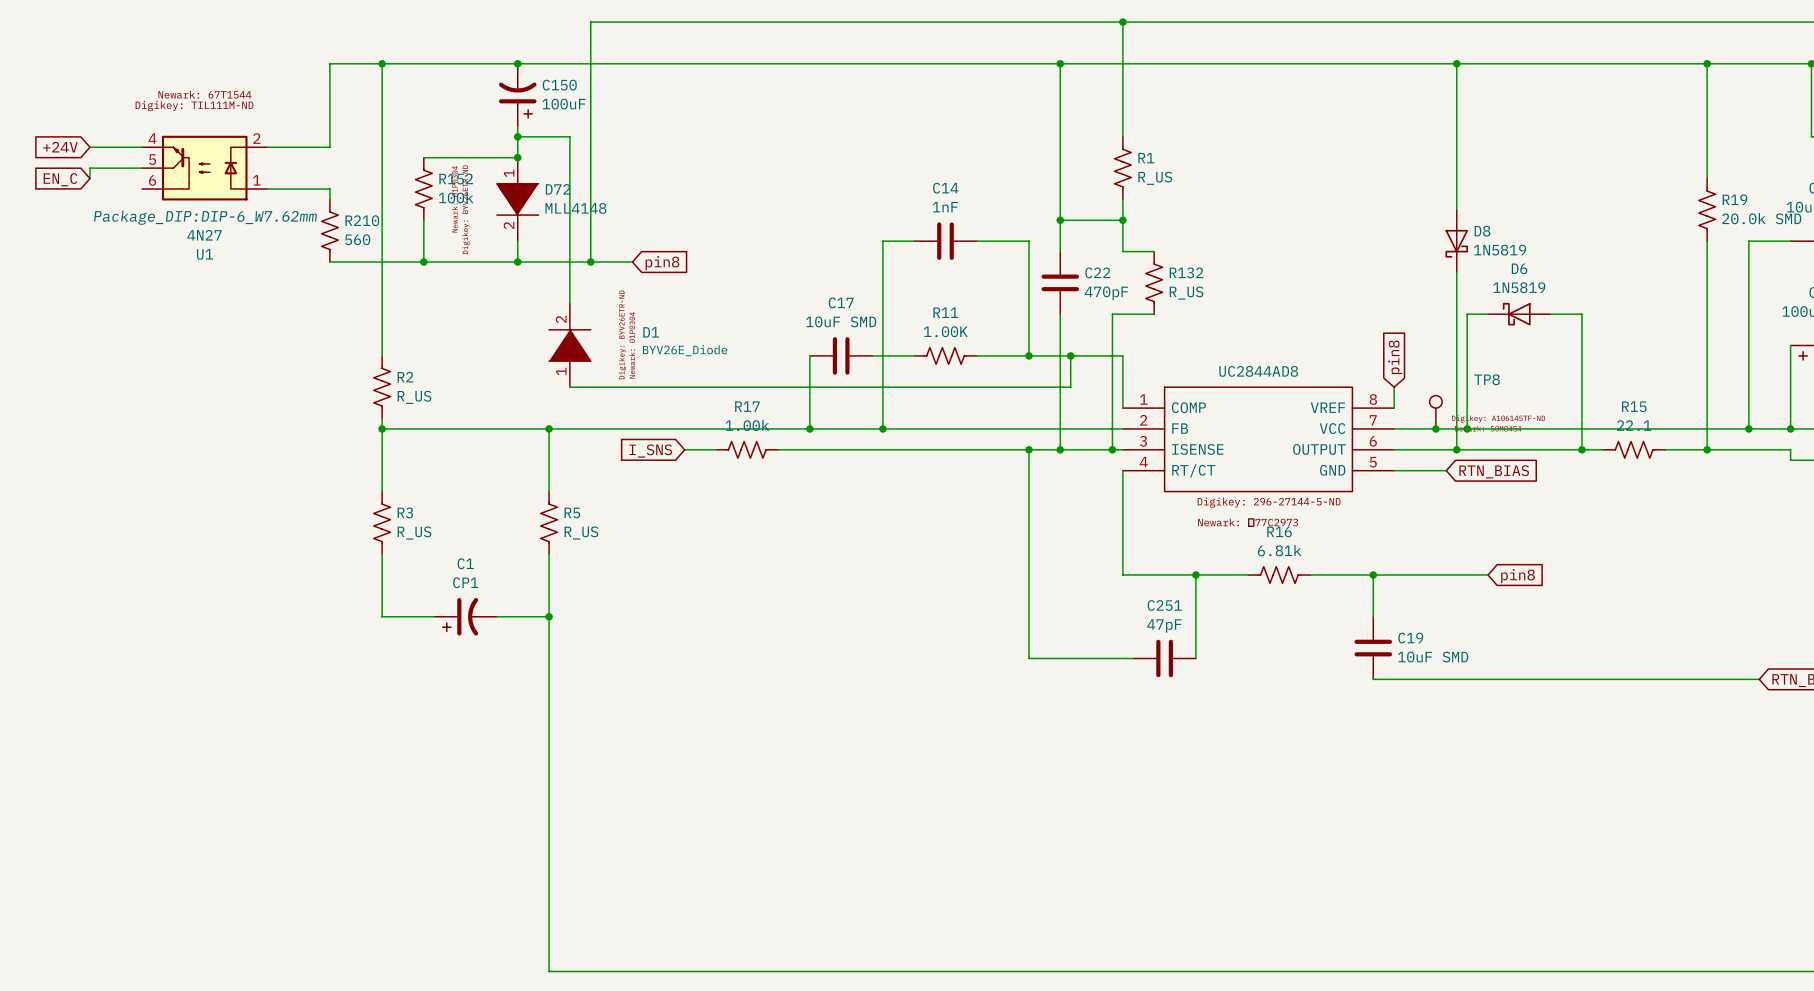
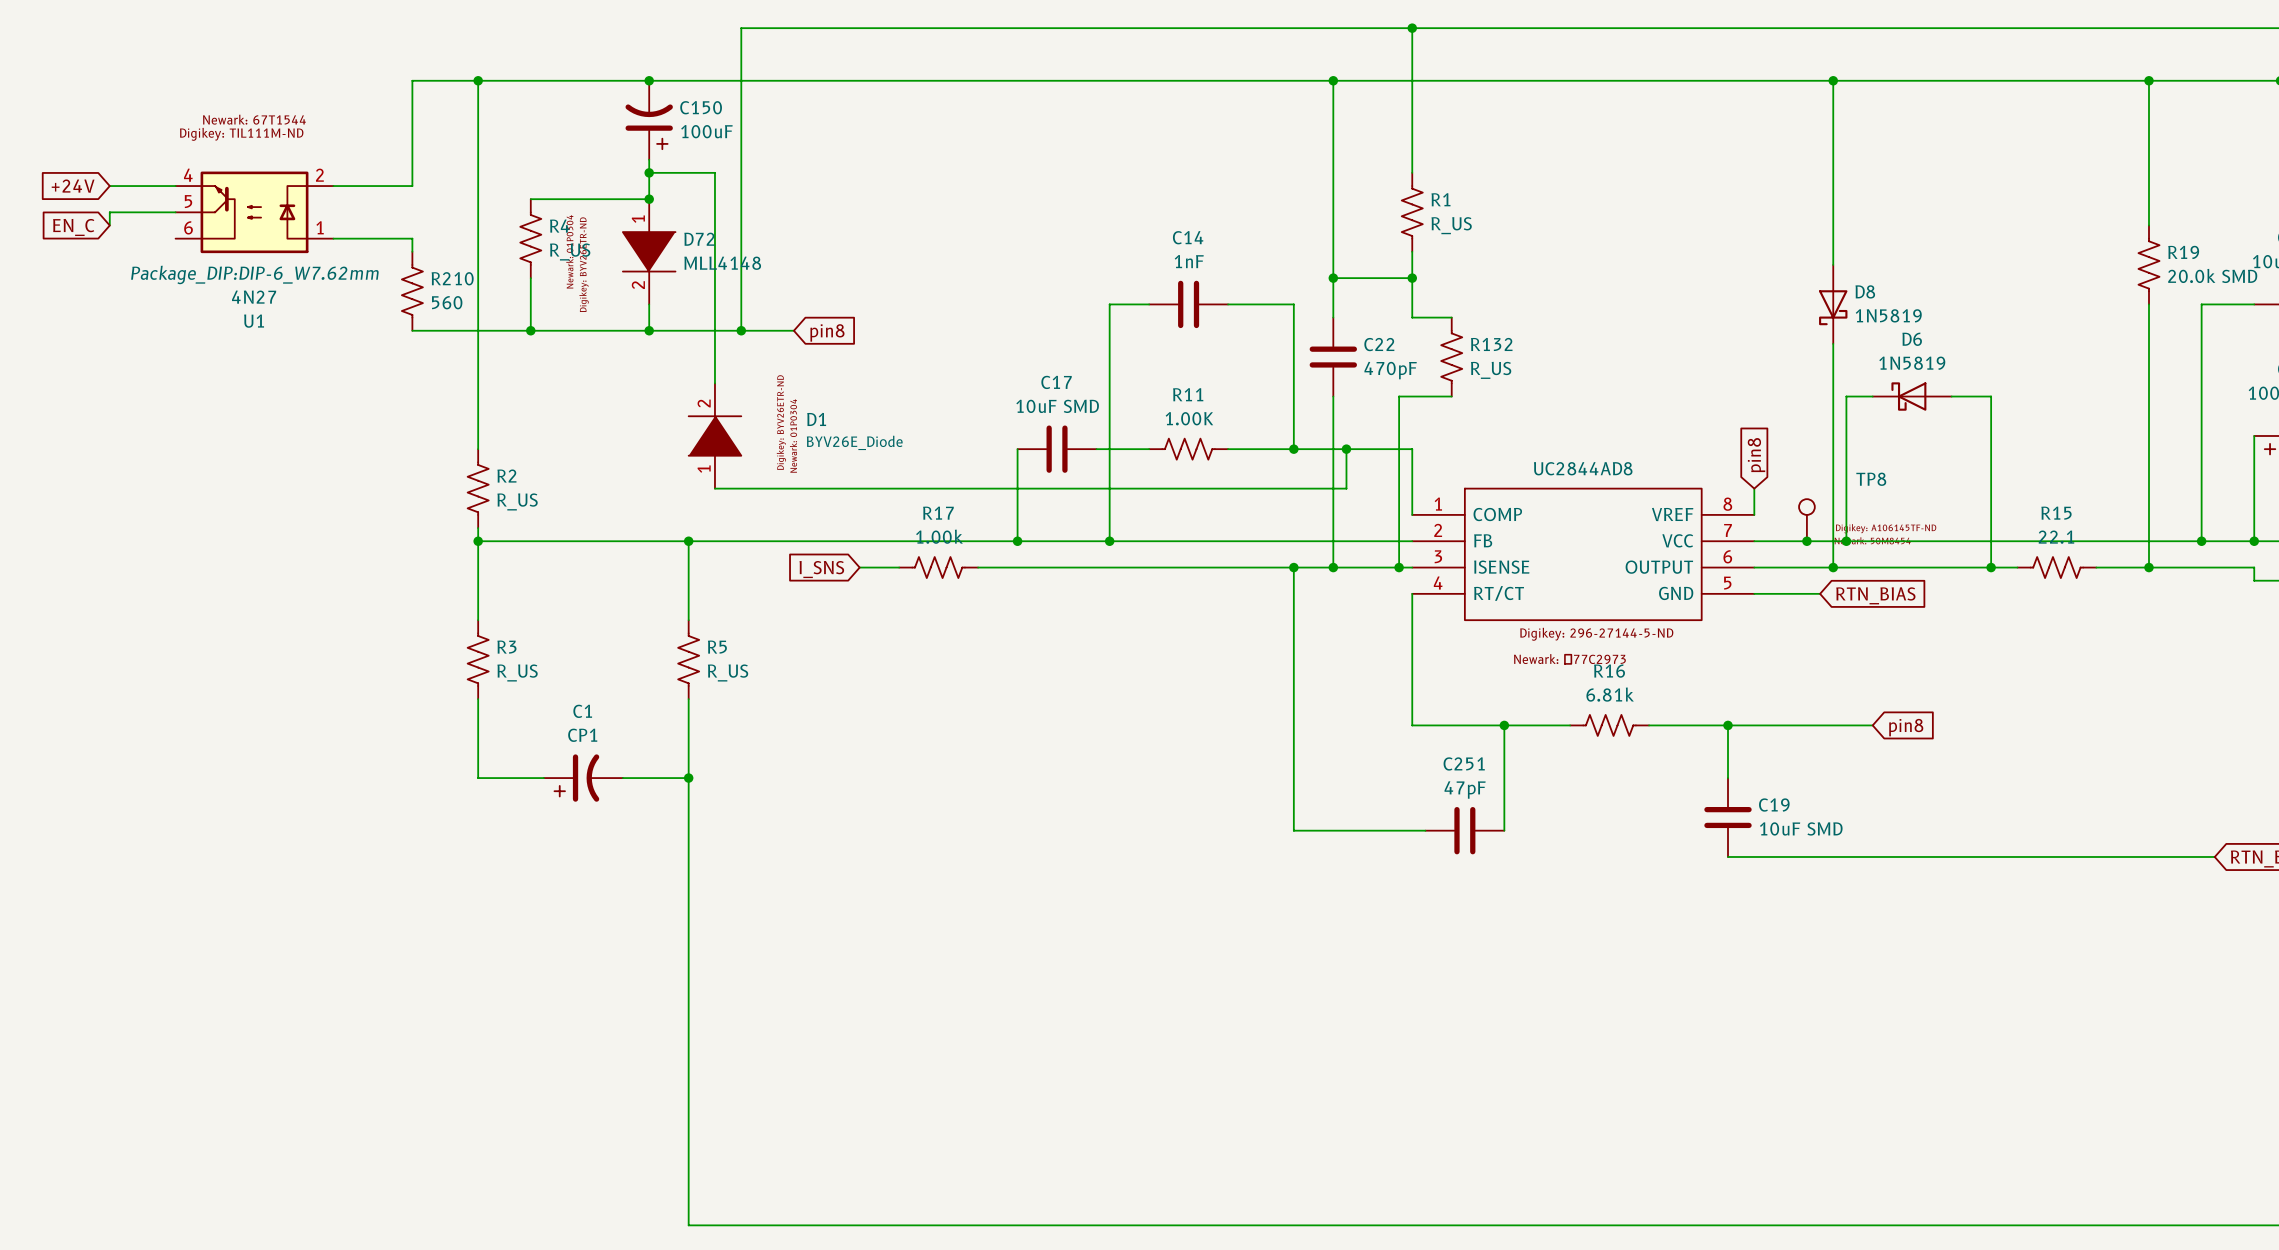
R152 name: R152 (456, 179) -> R4 (559, 226)
R152 value: 100k (456, 197) -> R_US (570, 251)

